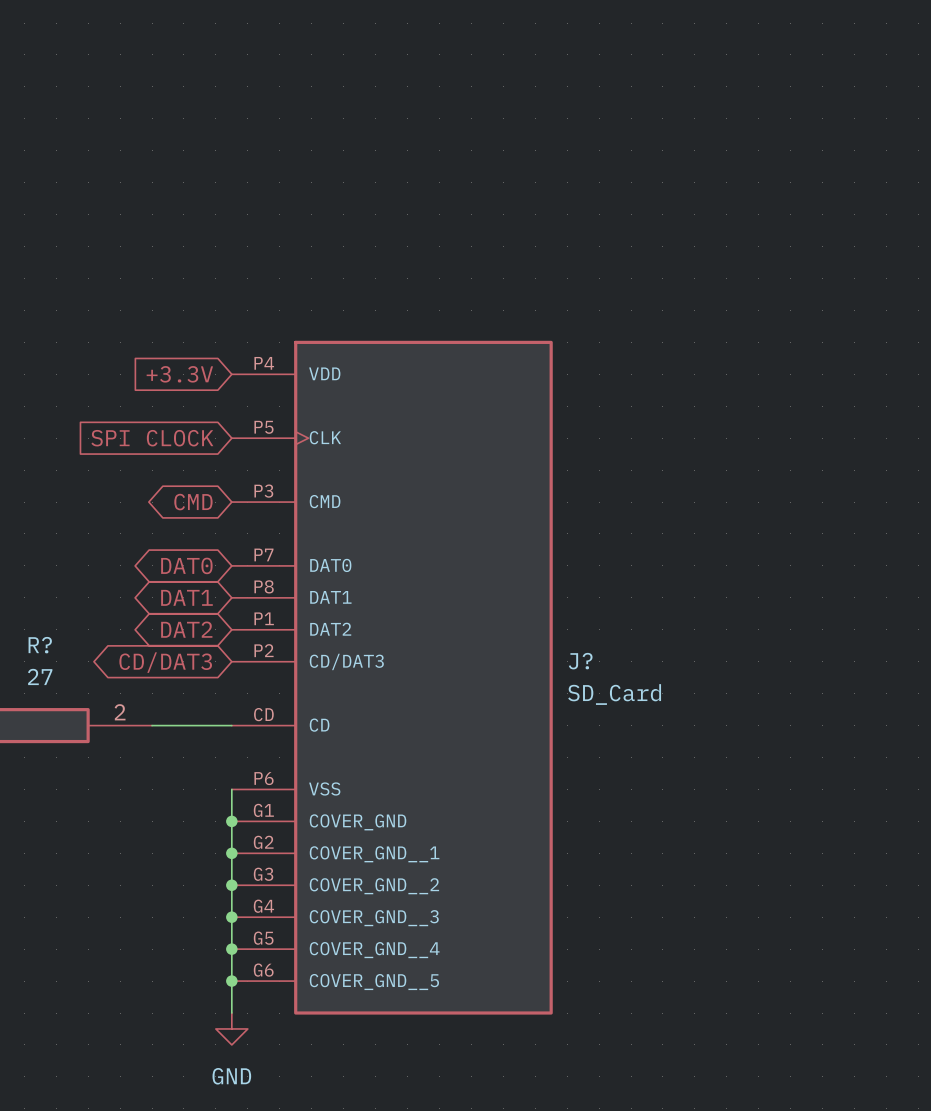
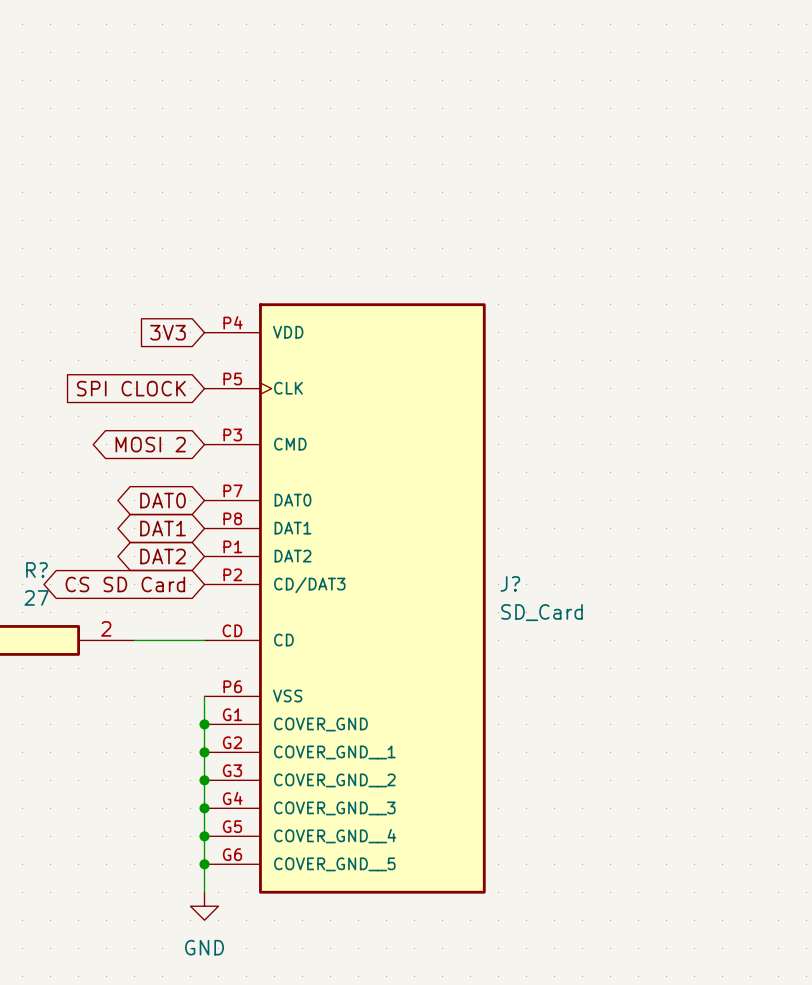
global label: +3.3V (179, 374) -> 3V3 (168, 332)
global label: CMD (193, 502) -> MOSI 2 (150, 444)
global label: CD/DAT3 (165, 662) -> CS SD Card (125, 584)

